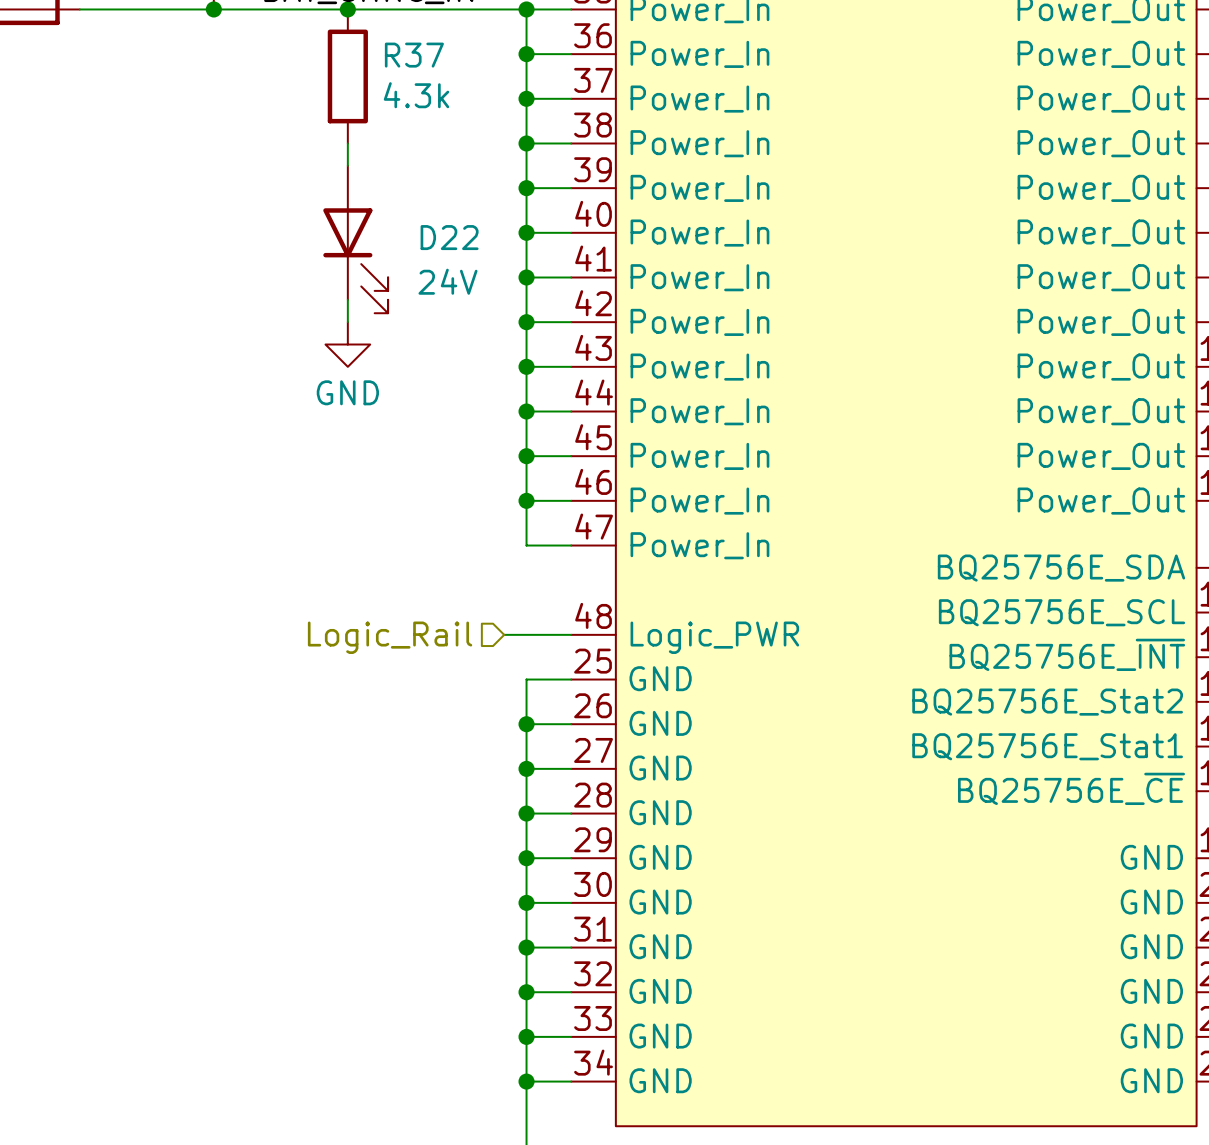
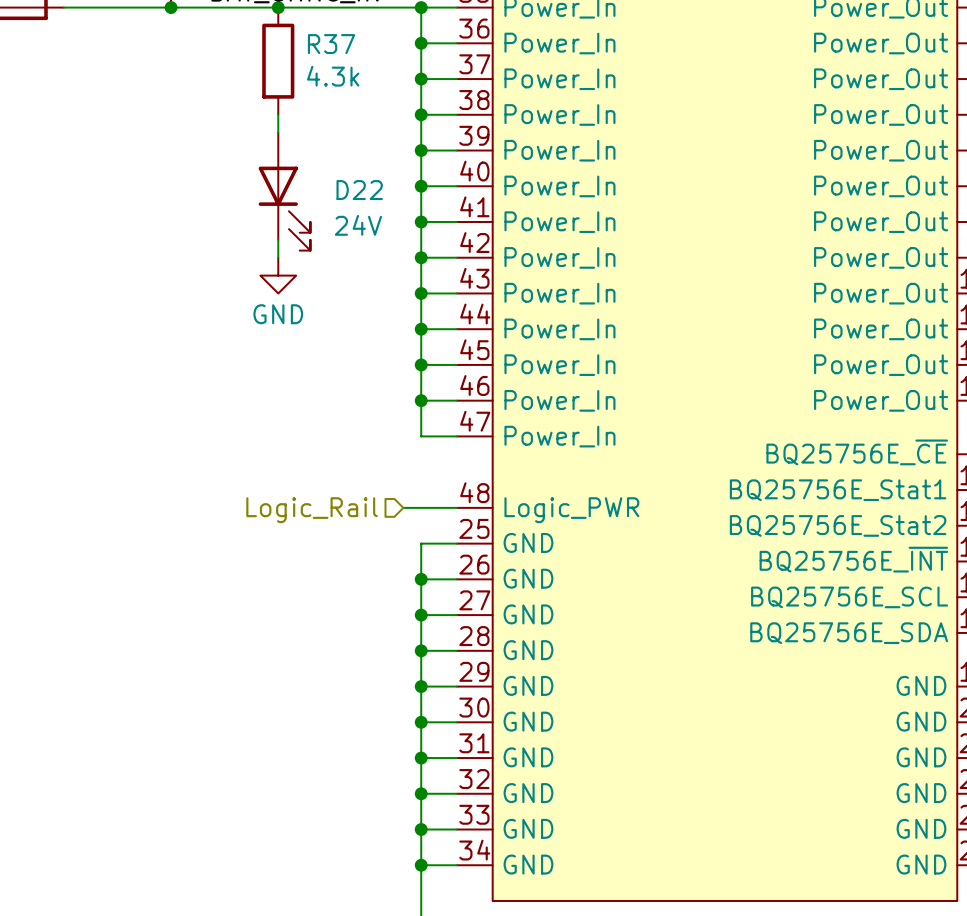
part pin name: BQ25756E_SDA (1061, 568) -> BQ25756E_~{CE} (857, 452)
part pin name: BQ25756E_SCL (1061, 612) -> BQ25756E_Stat1 (838, 490)
part pin name: BQ25756E_~{INT} (1067, 654) -> BQ25756E_Stat2 (838, 525)
part pin name: BQ25756E_Stat2 (1047, 702) -> BQ25756E_~{INT} (853, 559)
part pin name: BQ25756E_Stat1 (1047, 746) -> BQ25756E_SCL (849, 597)
part pin name: BQ25756E_~{CE} (1071, 788) -> BQ25756E_SDA (849, 633)

